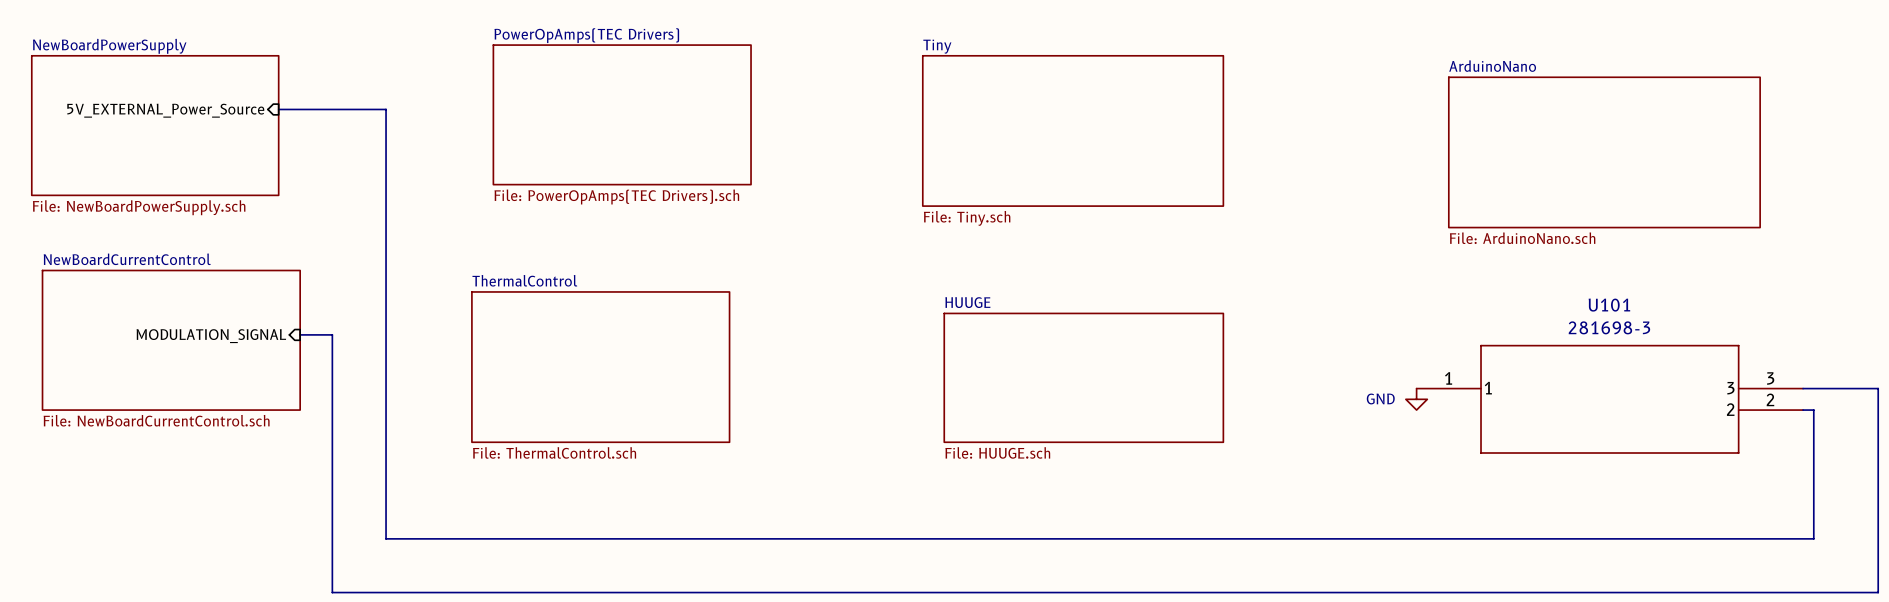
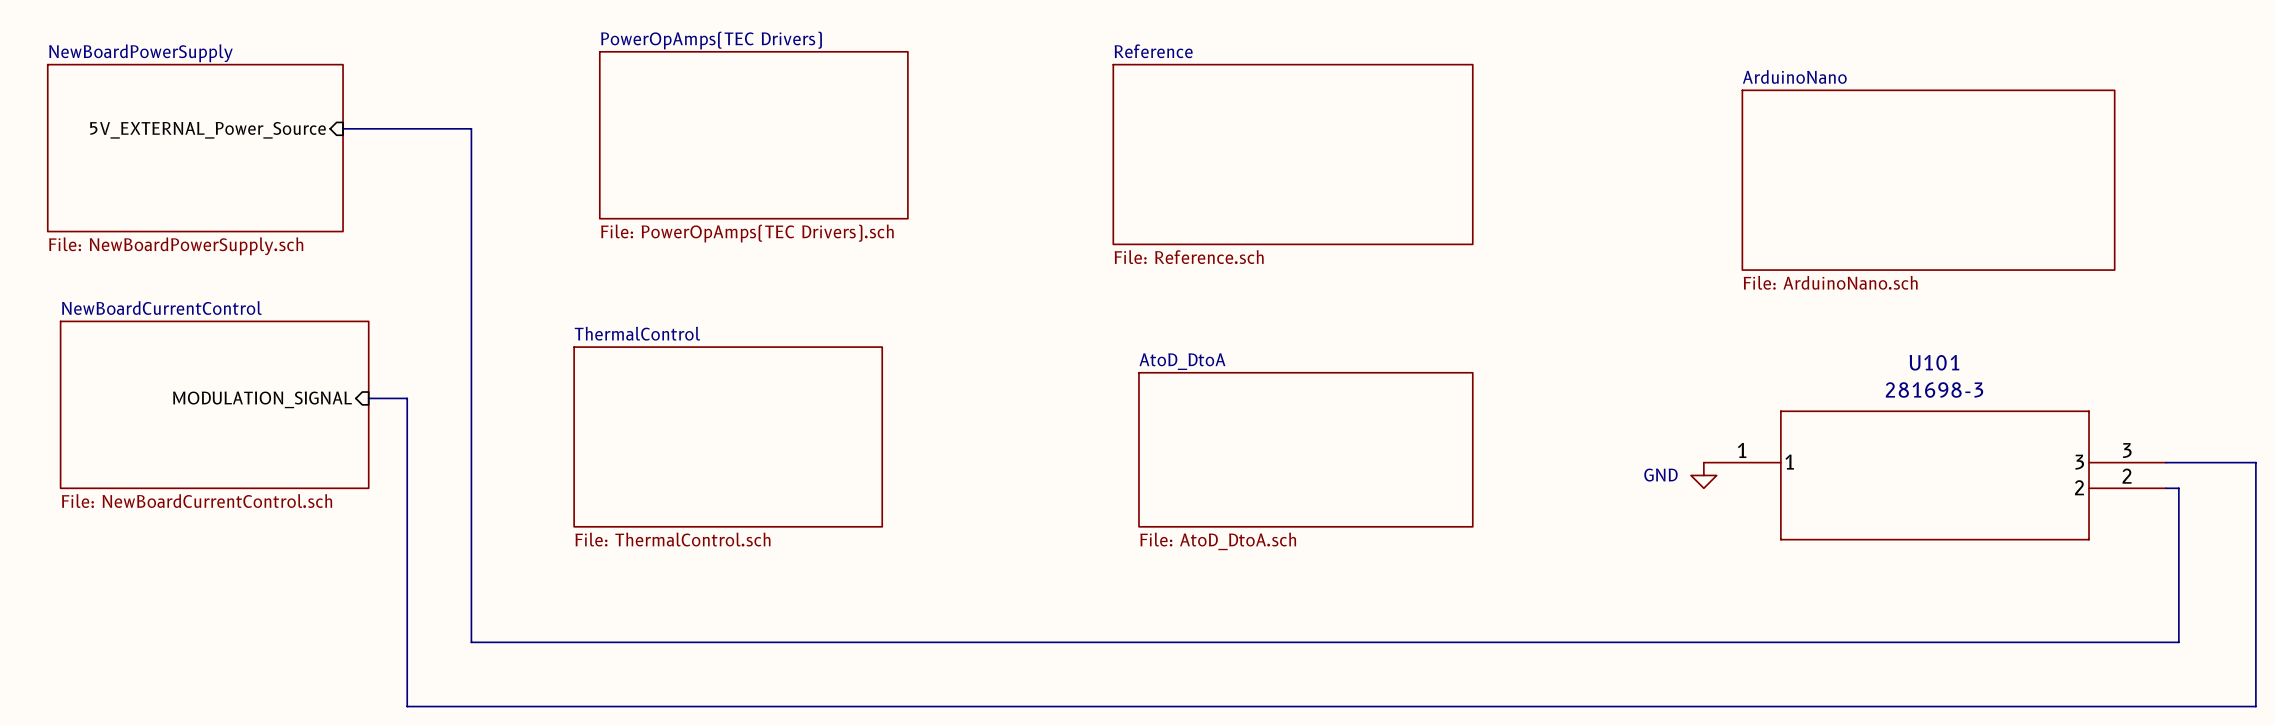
sheet Tiny name: Tiny (937, 46) -> Reference (1153, 51)
sheet Tiny value: File: Tiny.sch (967, 218) -> File: Reference.sch (1189, 257)
sheet HUUGE name: HUUGE (967, 302) -> AtoD_DtoA (1182, 361)
sheet HUUGE value: File: HUUGE.sch (997, 452) -> File: AtoD_DtoA.sch (1218, 541)

